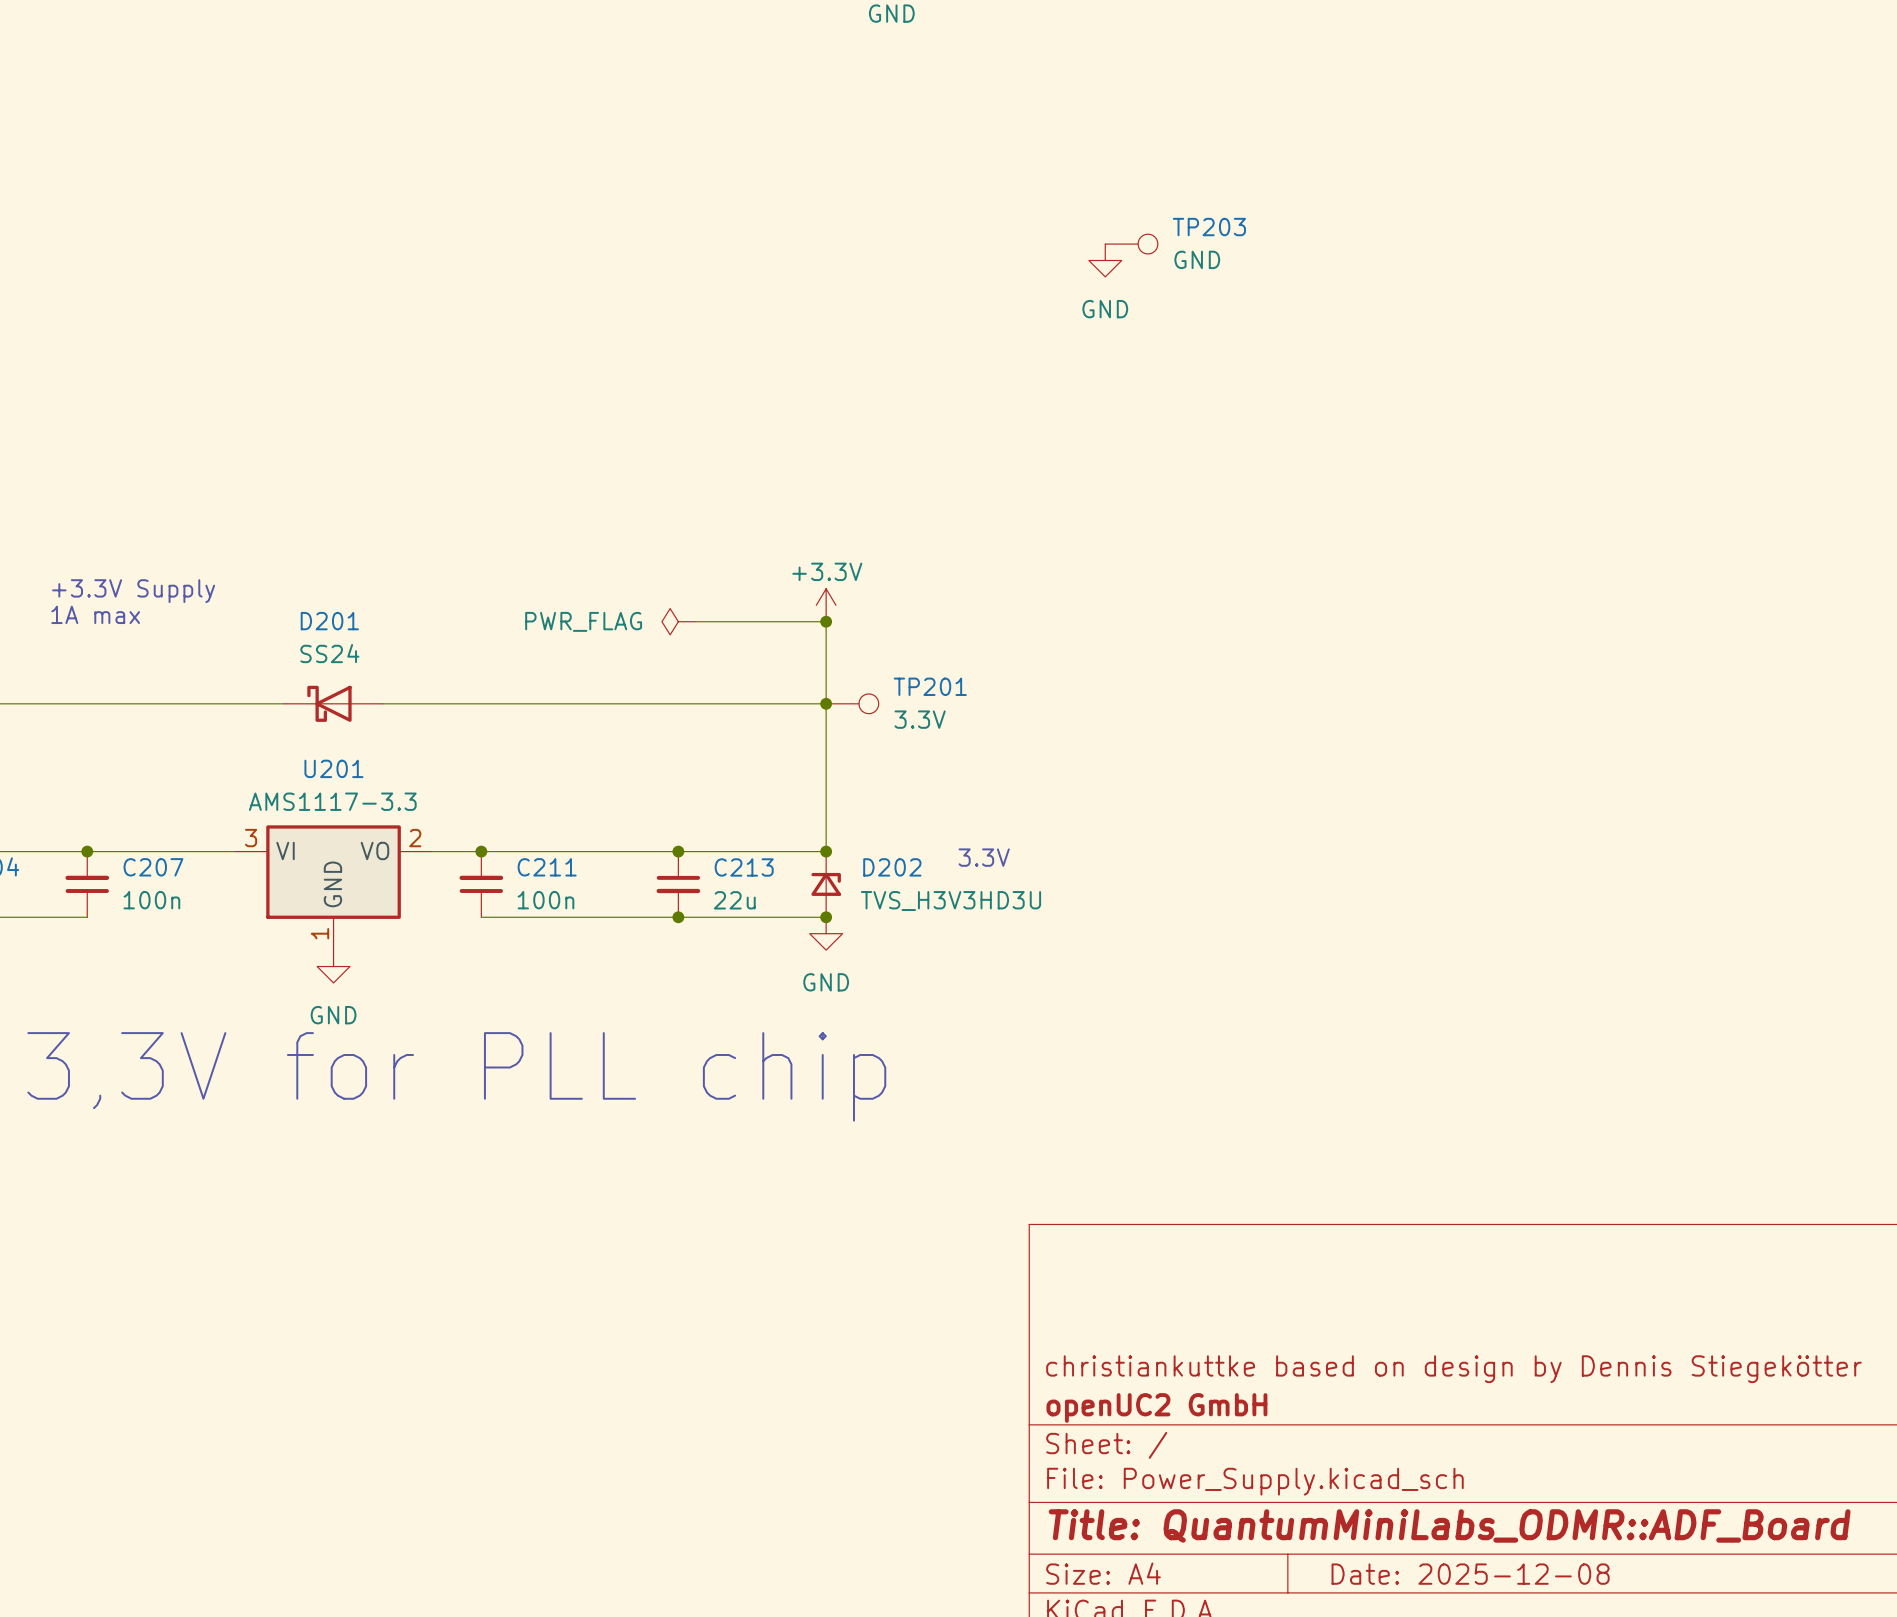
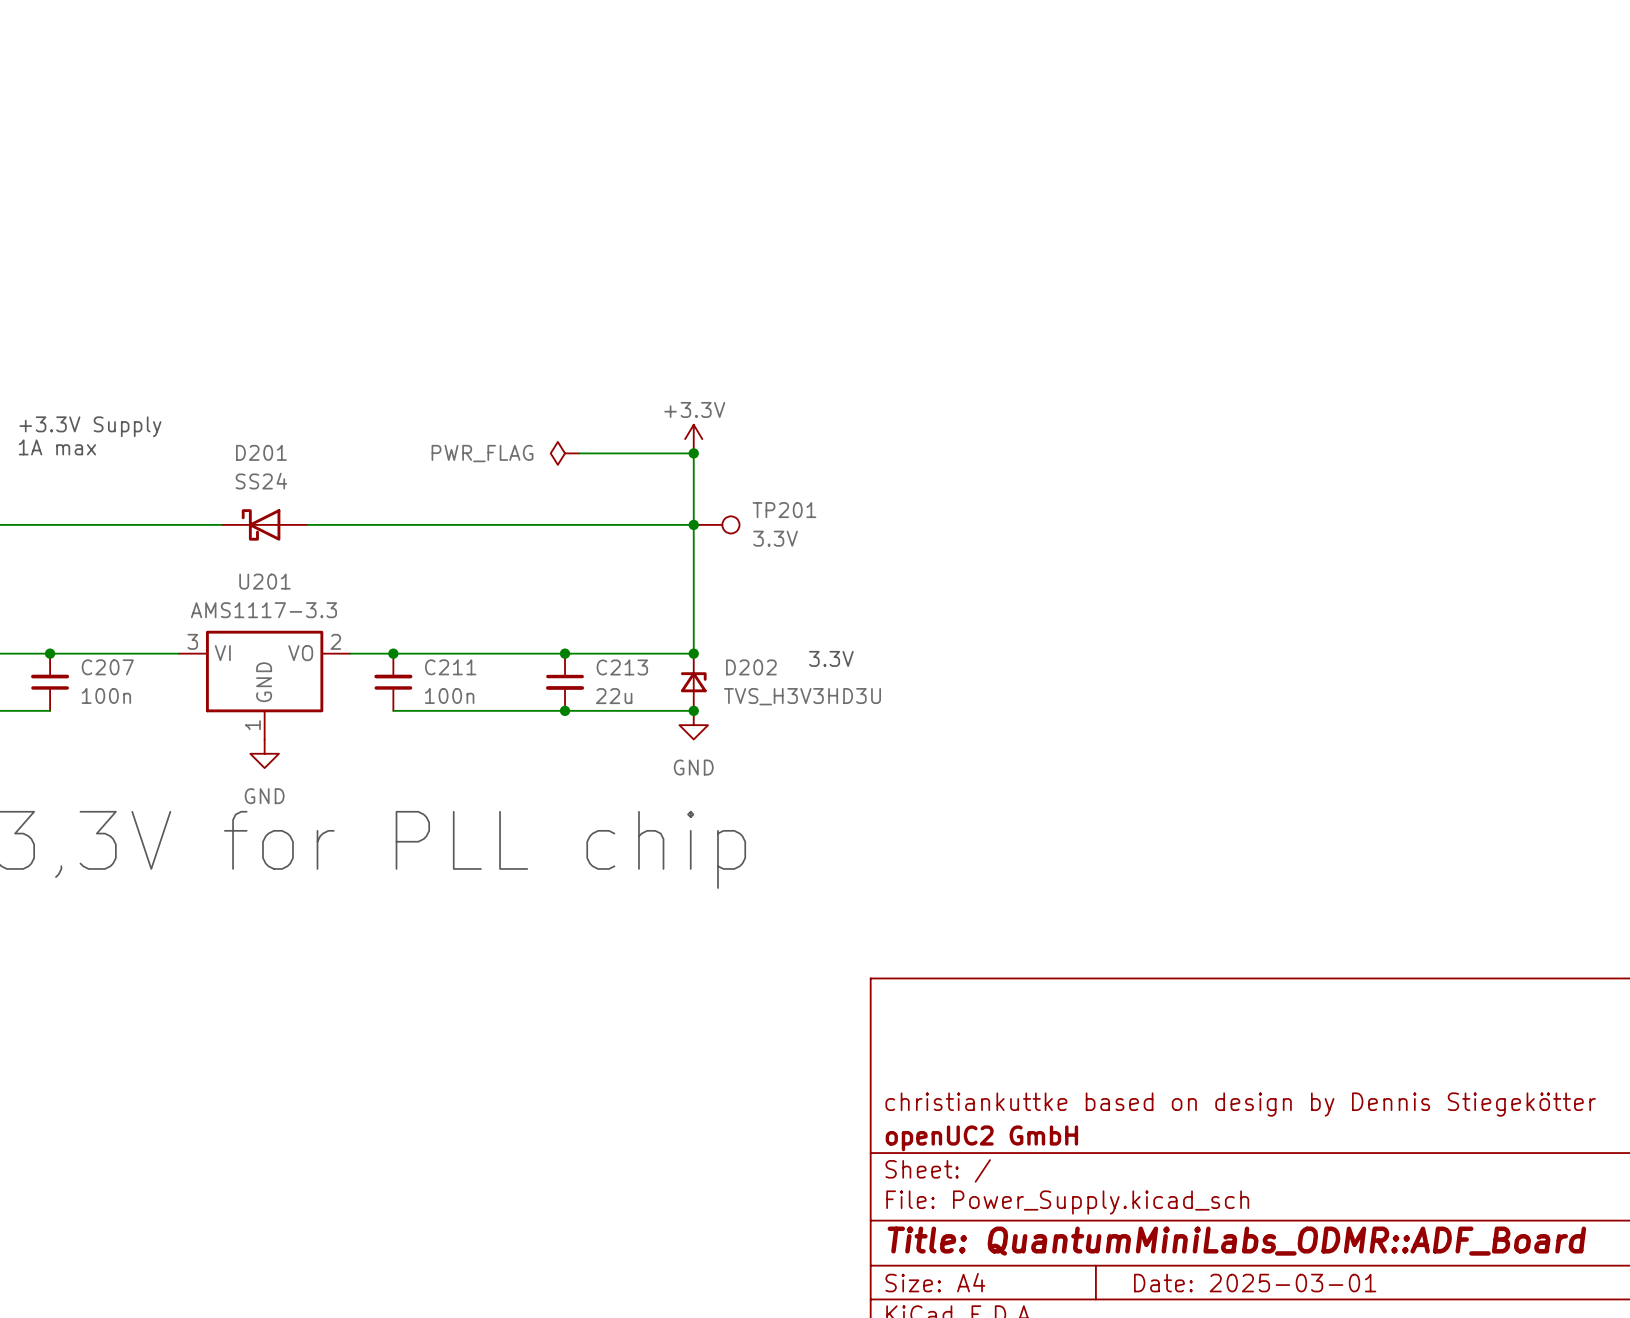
TP203: GND (1131, 244) -> none
power symbol: GND (1105, 260) -> none
title block: Date: 2025-12-08 (1470, 1574) -> Date: 2025-03-01 (1255, 1283)

